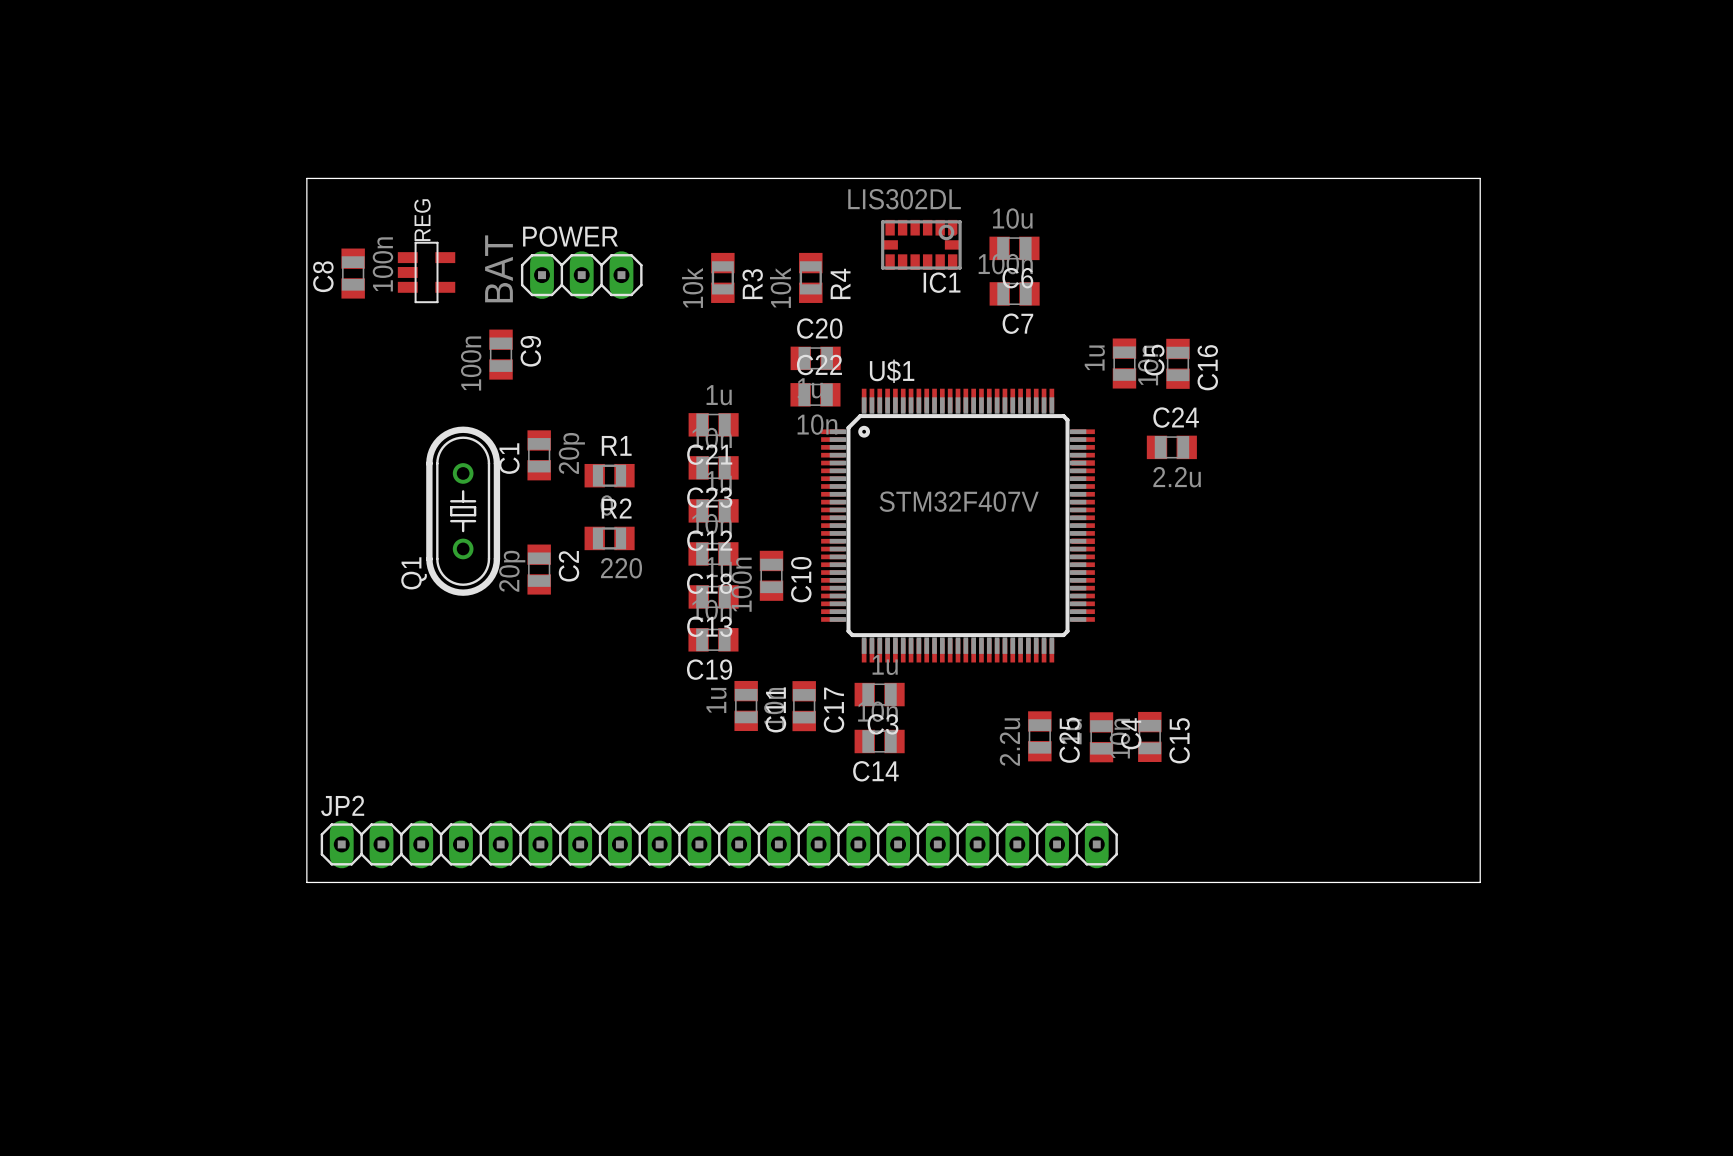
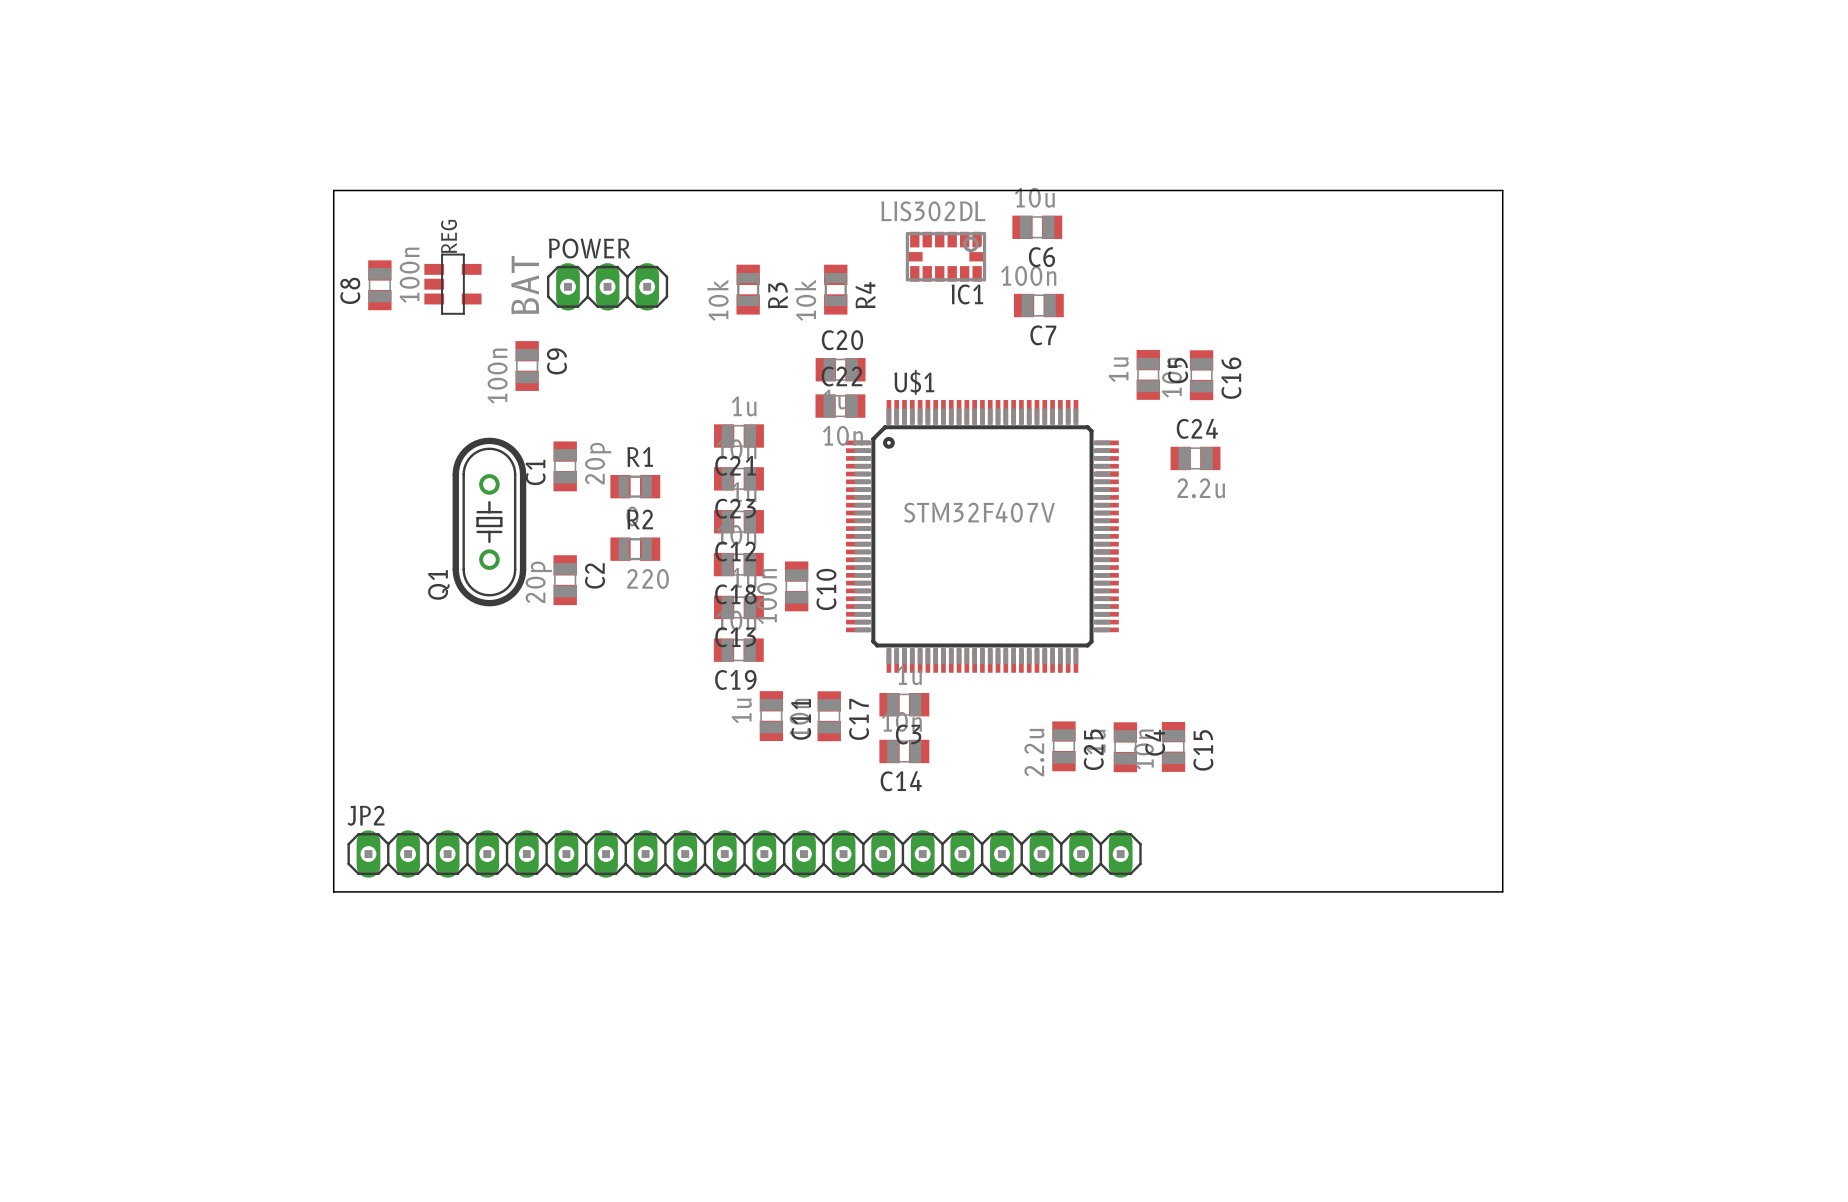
C6 position: (1014, 248) -> (1037, 227)

